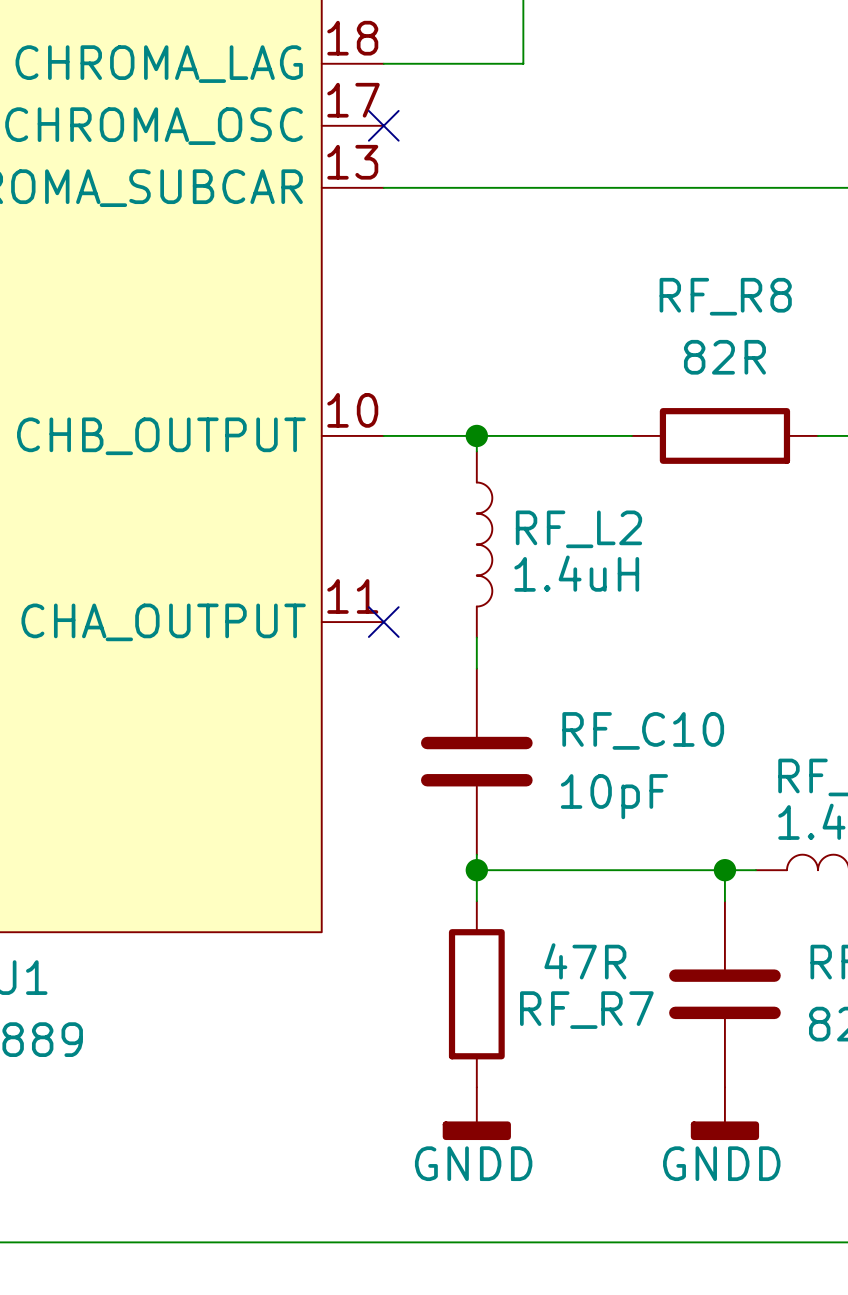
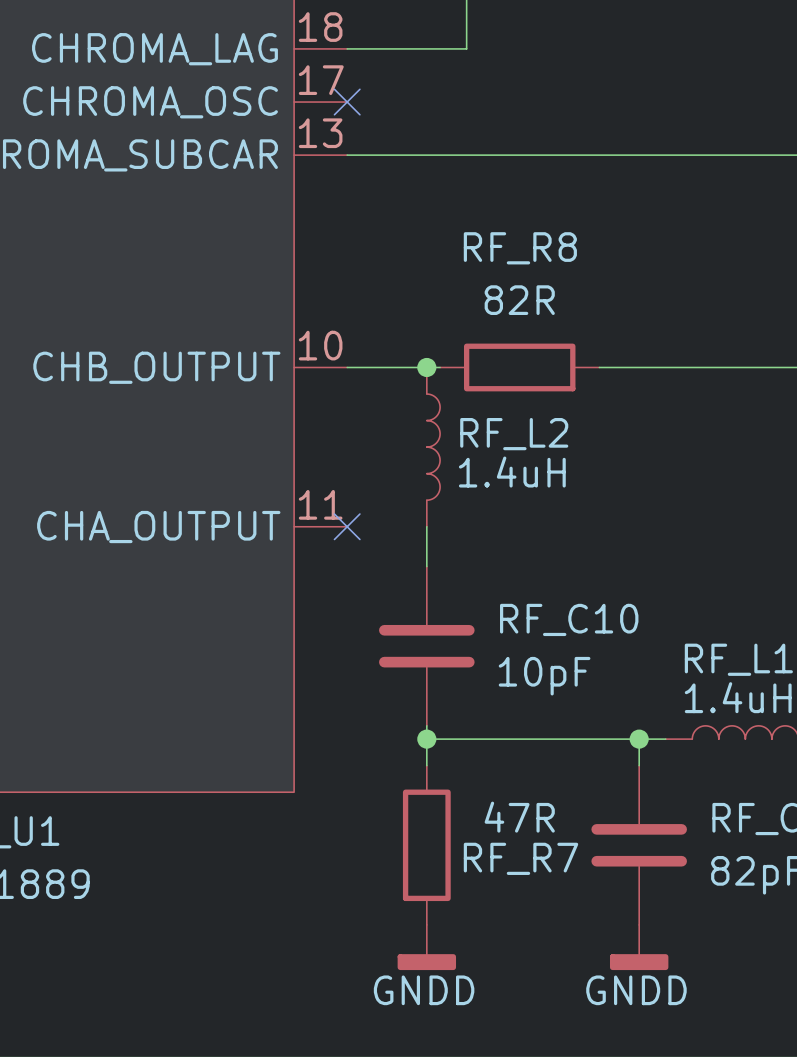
wire: (492, 435) (631, 435) -> (599, 367) (718, 367)
RF_R8 position: (724, 435) -> (519, 367)
RF_L2 position: (484, 544) -> (433, 447)

